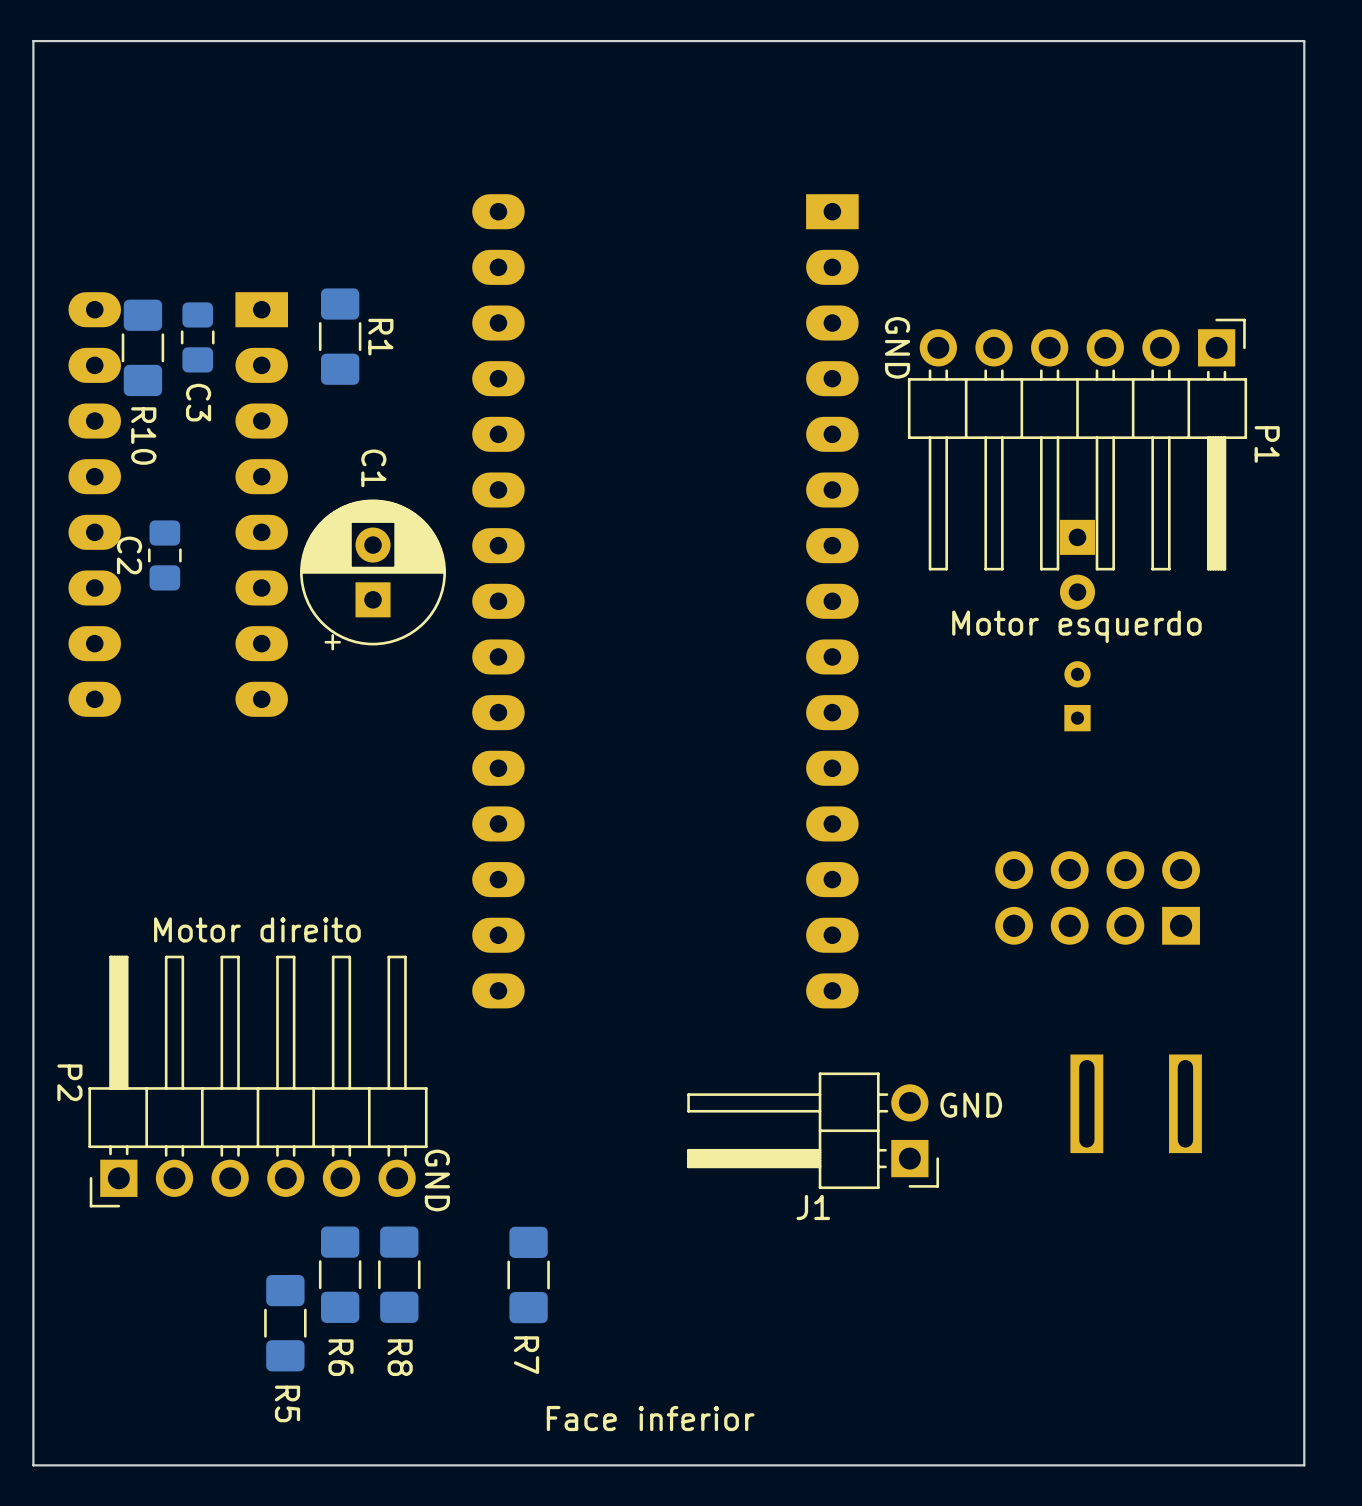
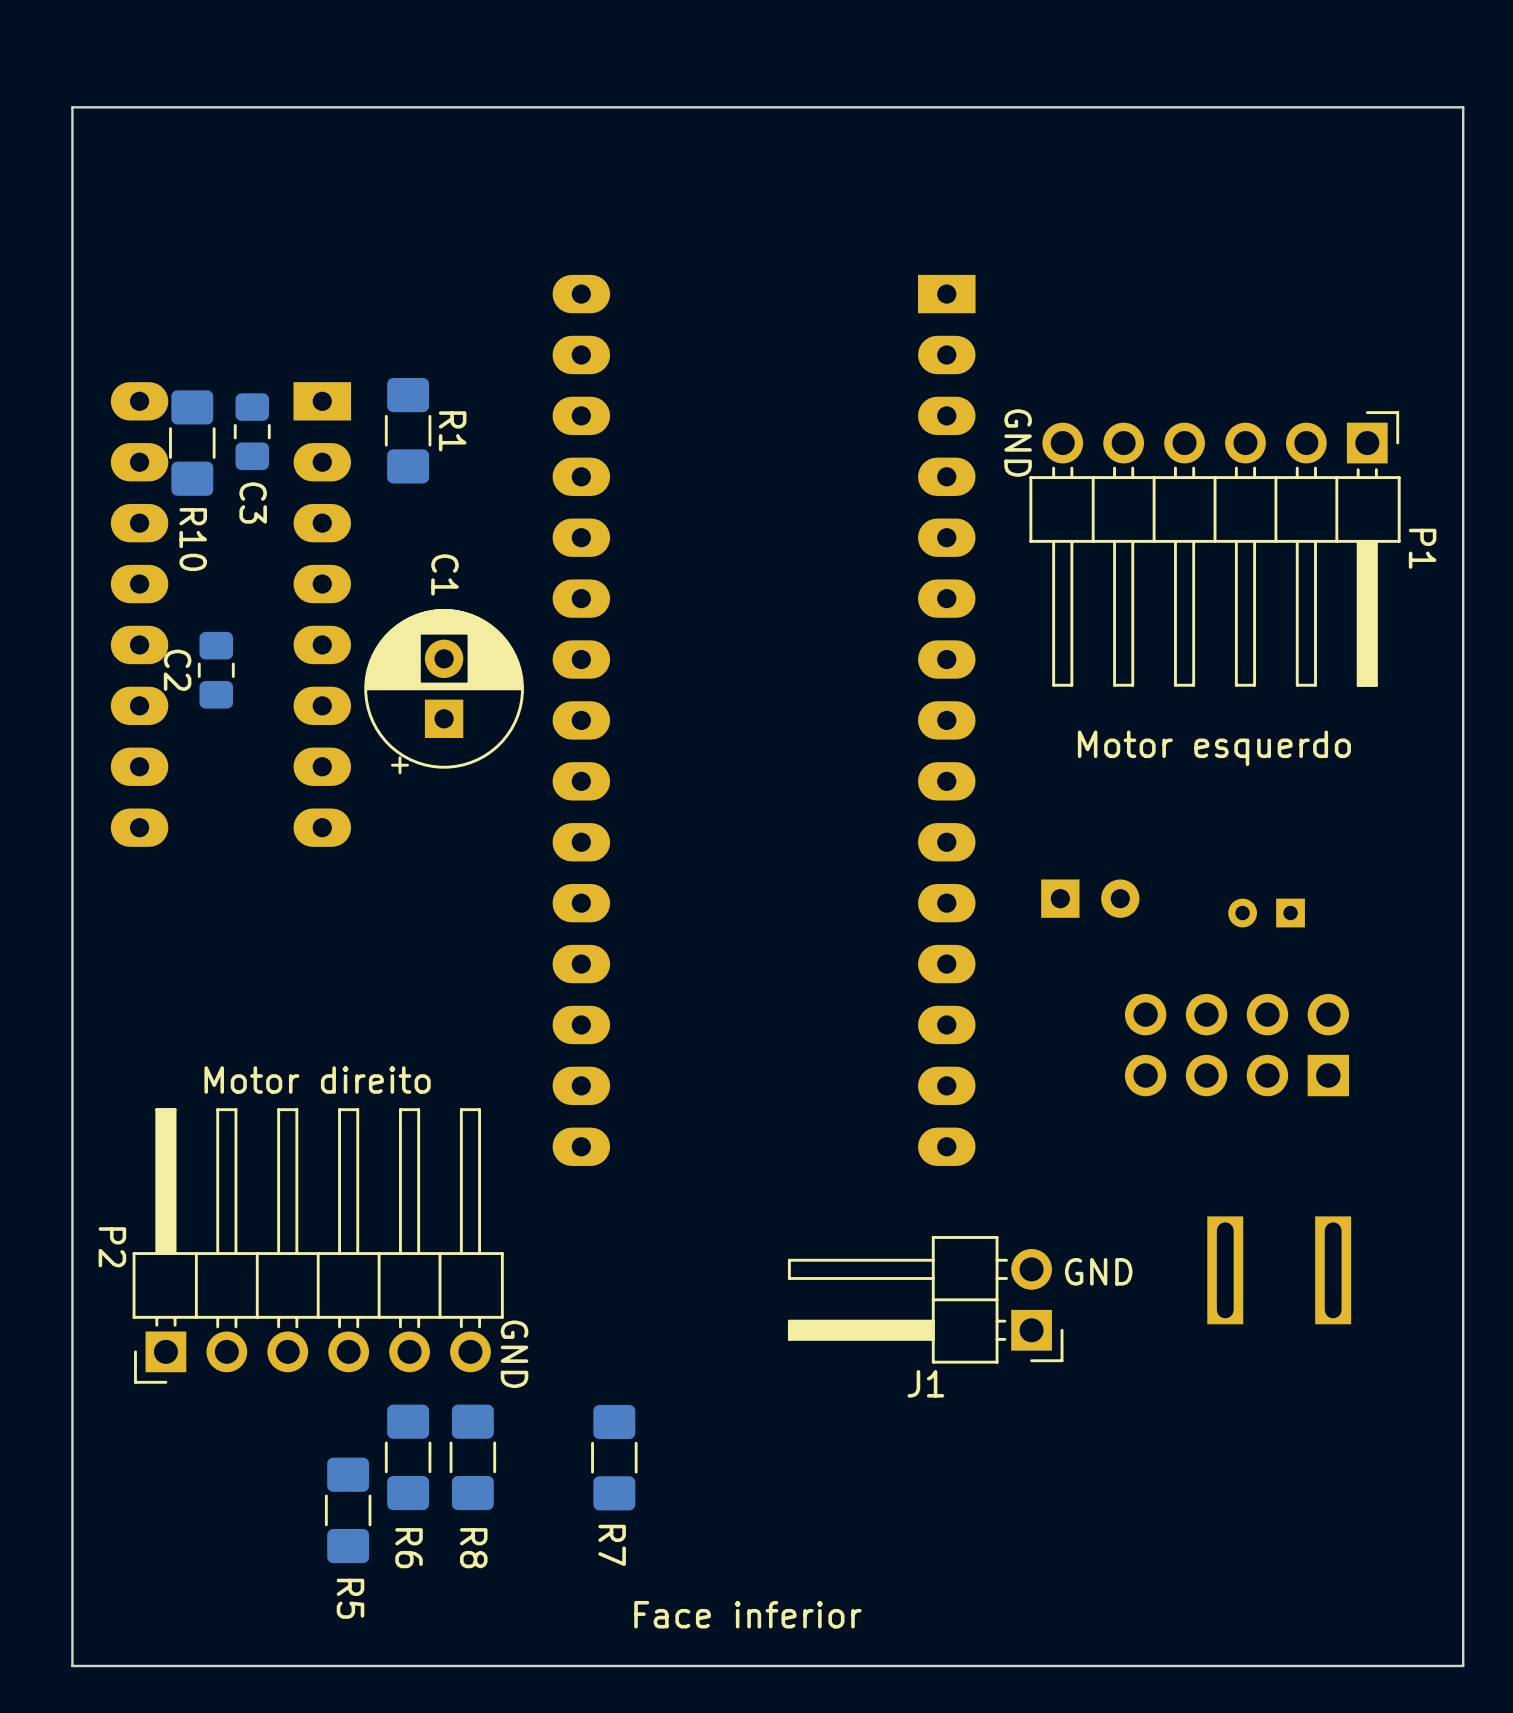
part rotation: 0° (1077, 564) -> 90° counterclockwise (1090, 898)
part position: (1077, 564) -> (1090, 898)
part rotation: 0° (1077, 696) -> 90° counterclockwise (1266, 913)
part position: (1077, 696) -> (1266, 913)

